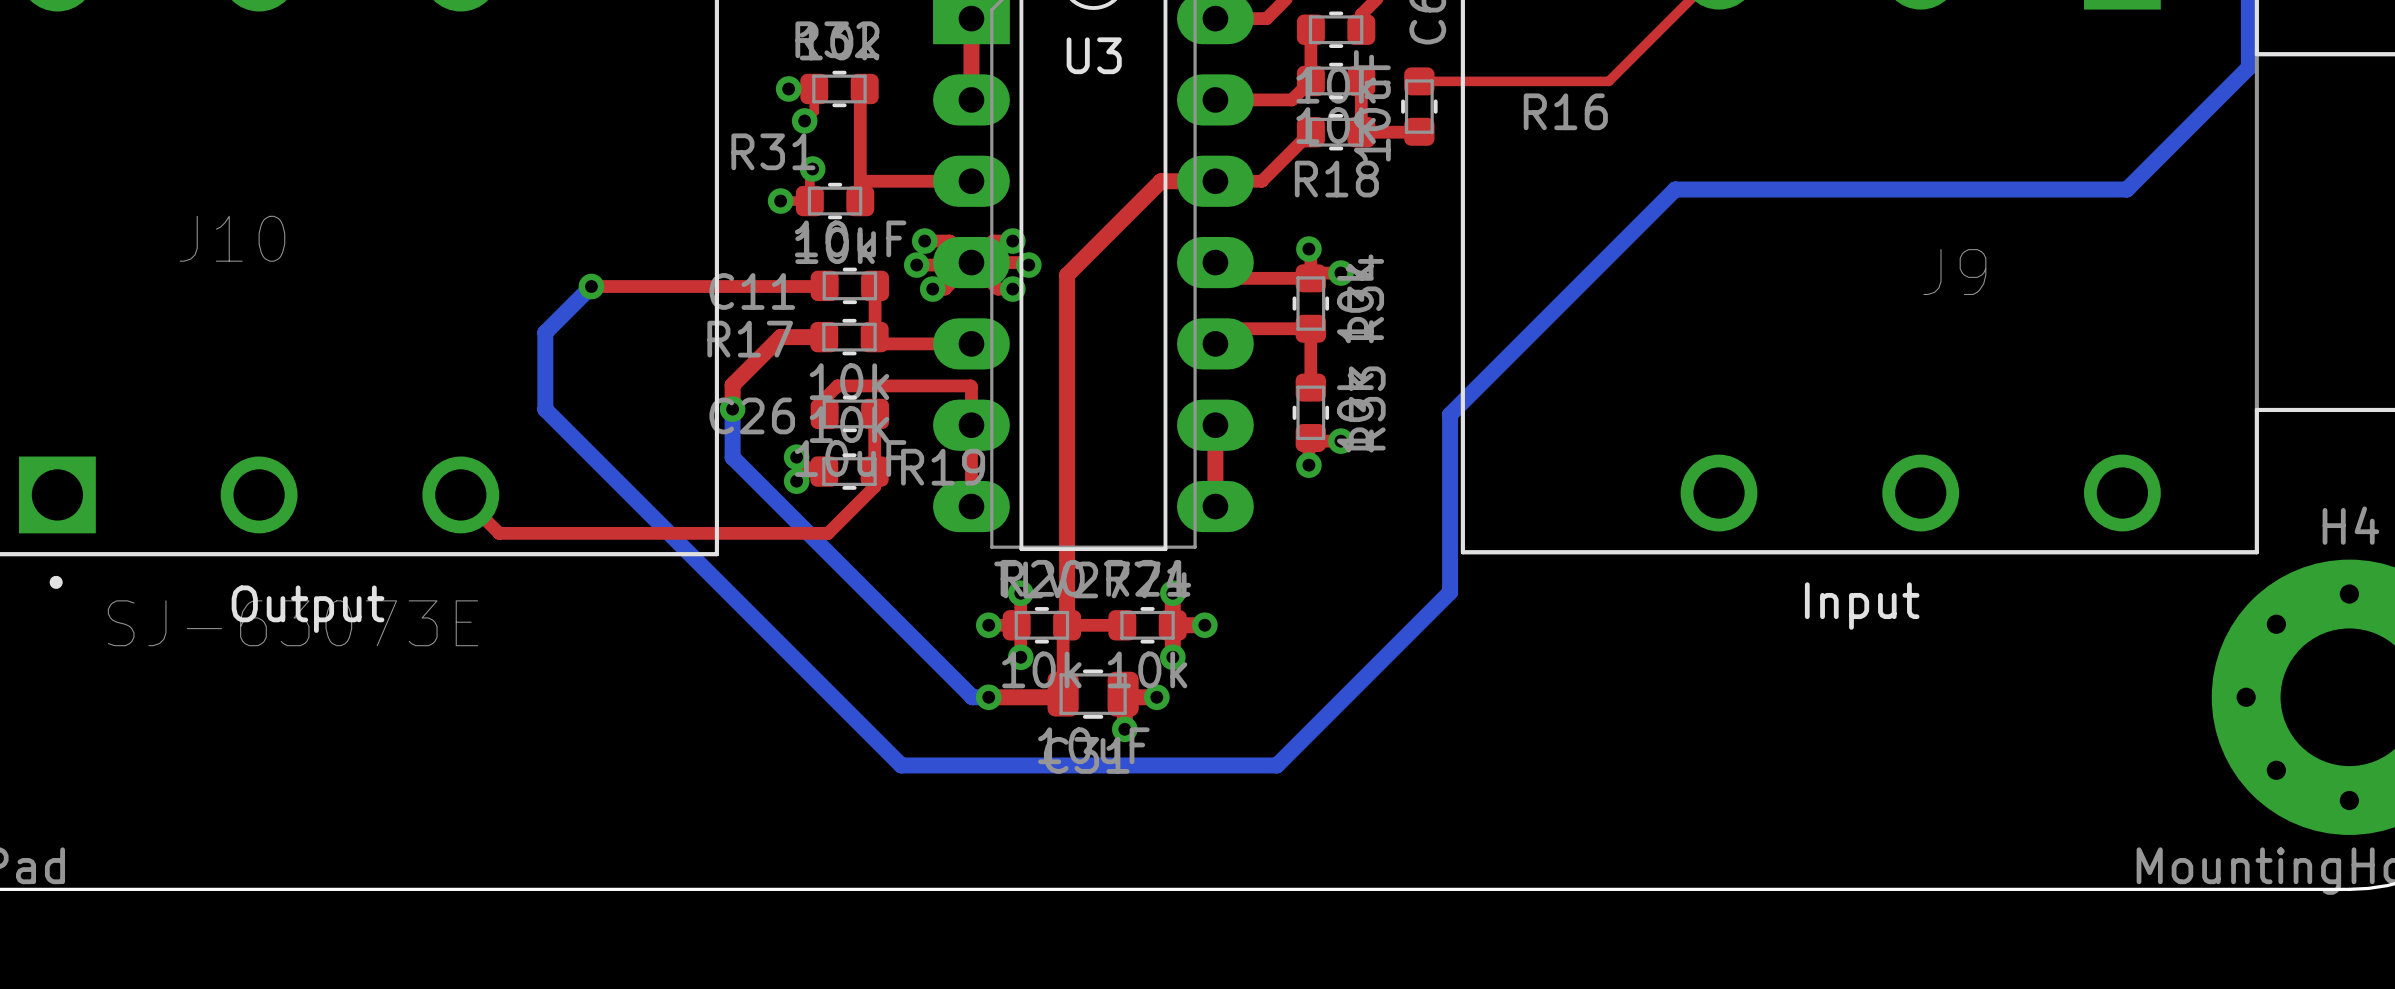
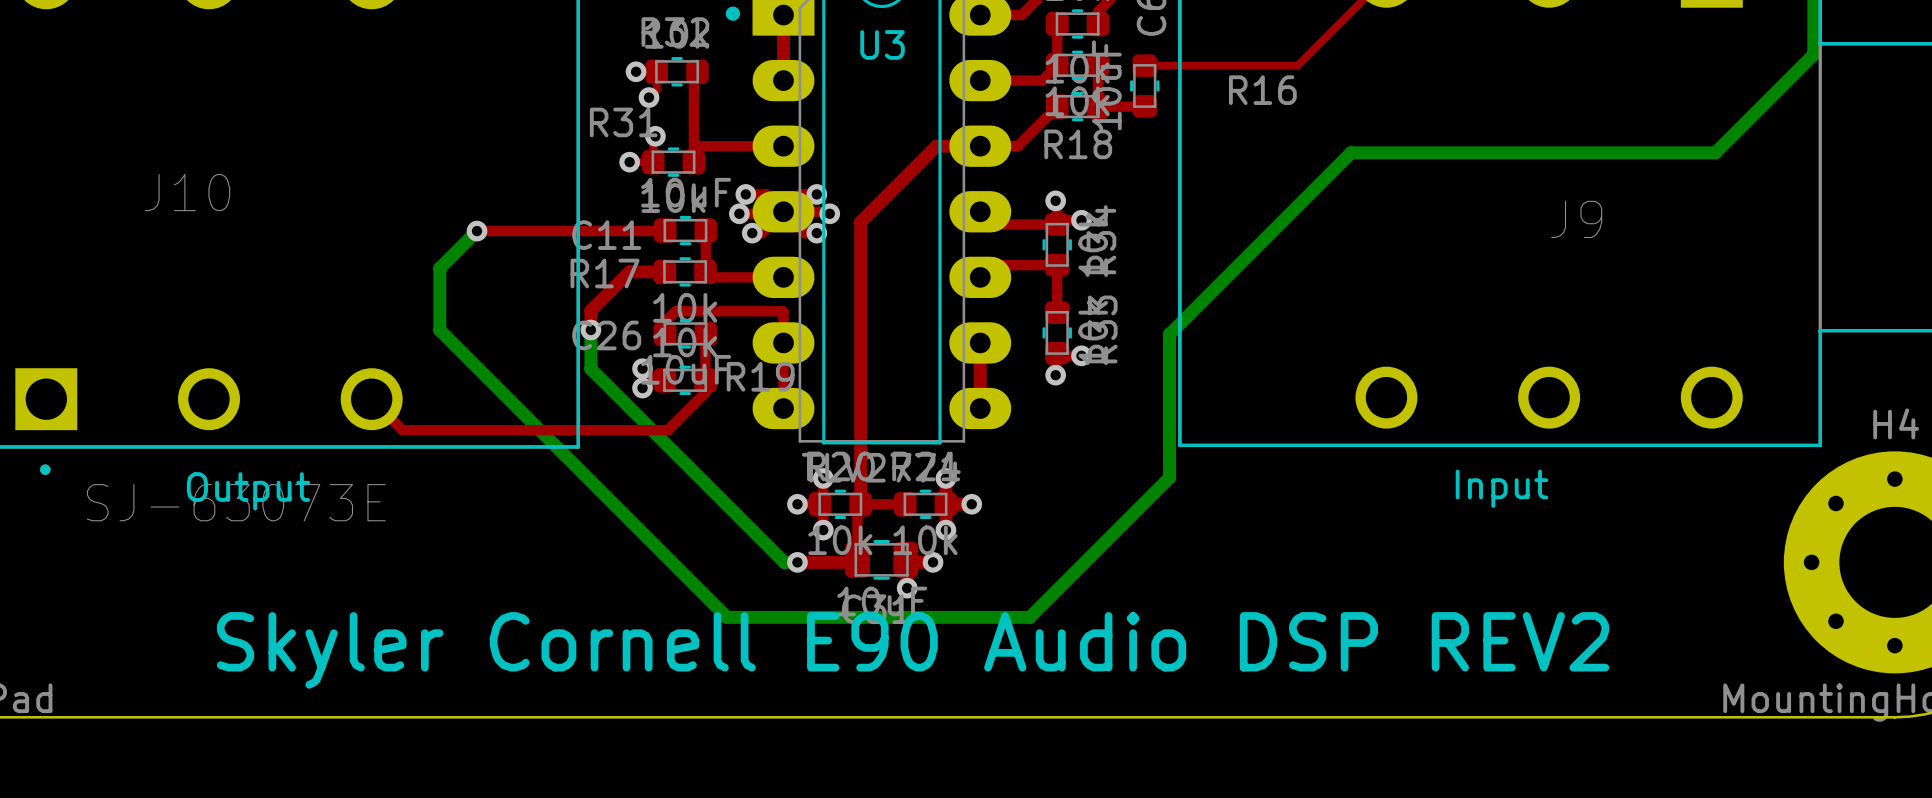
drawing: none -> [725, 6, 741, 21]
text: none -> Skyler Cornell E90 Audio DSP REV2 (913, 650)

